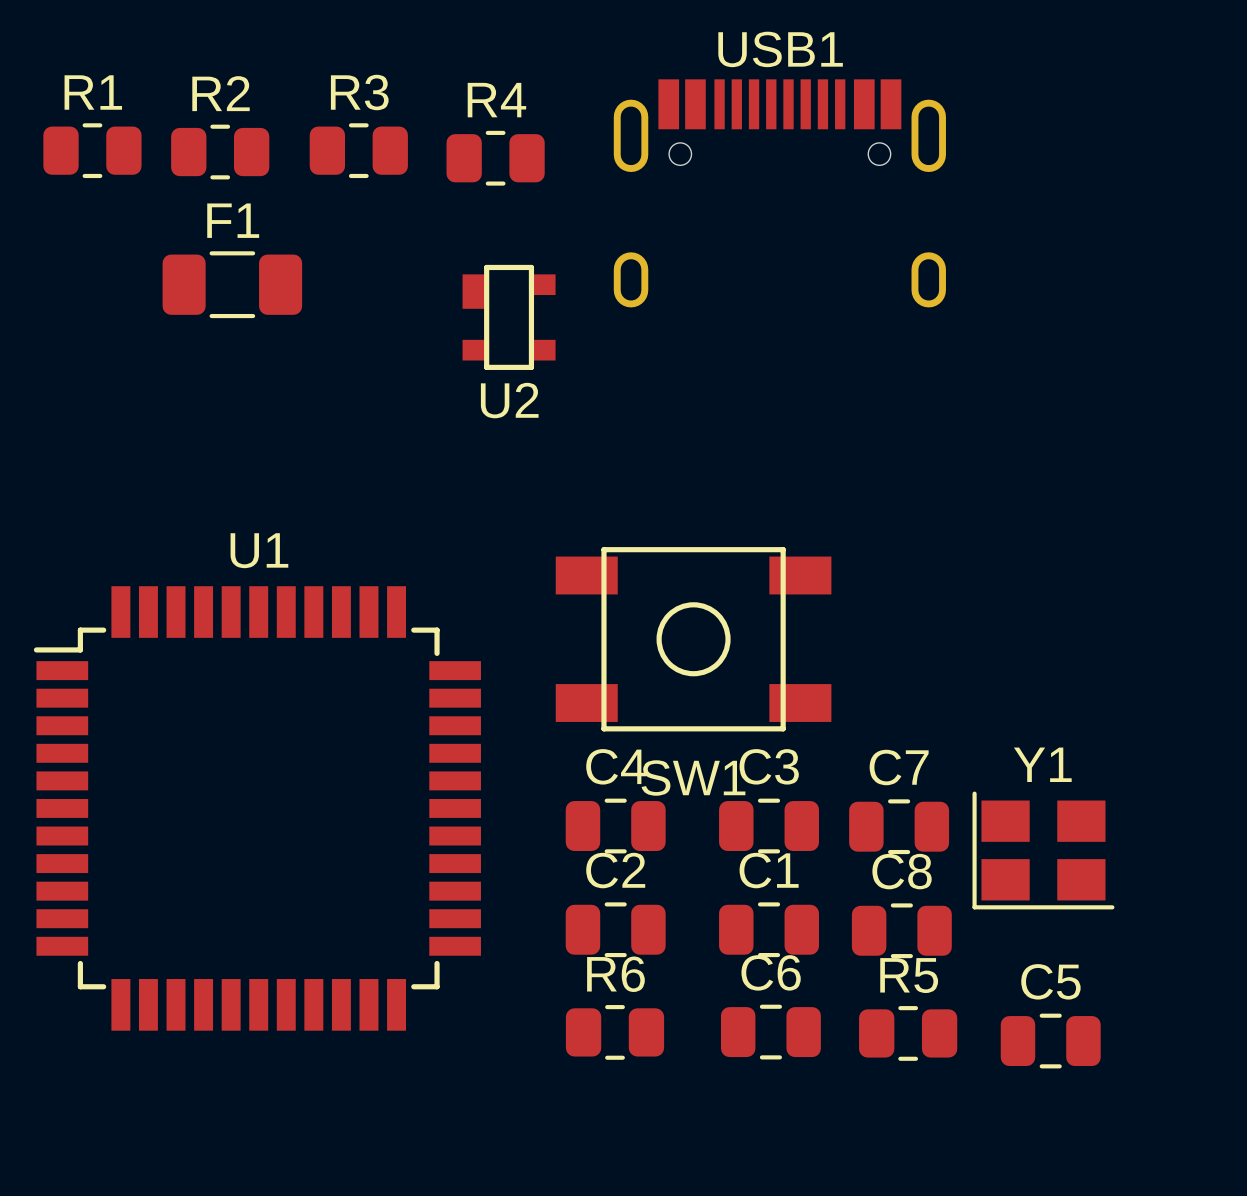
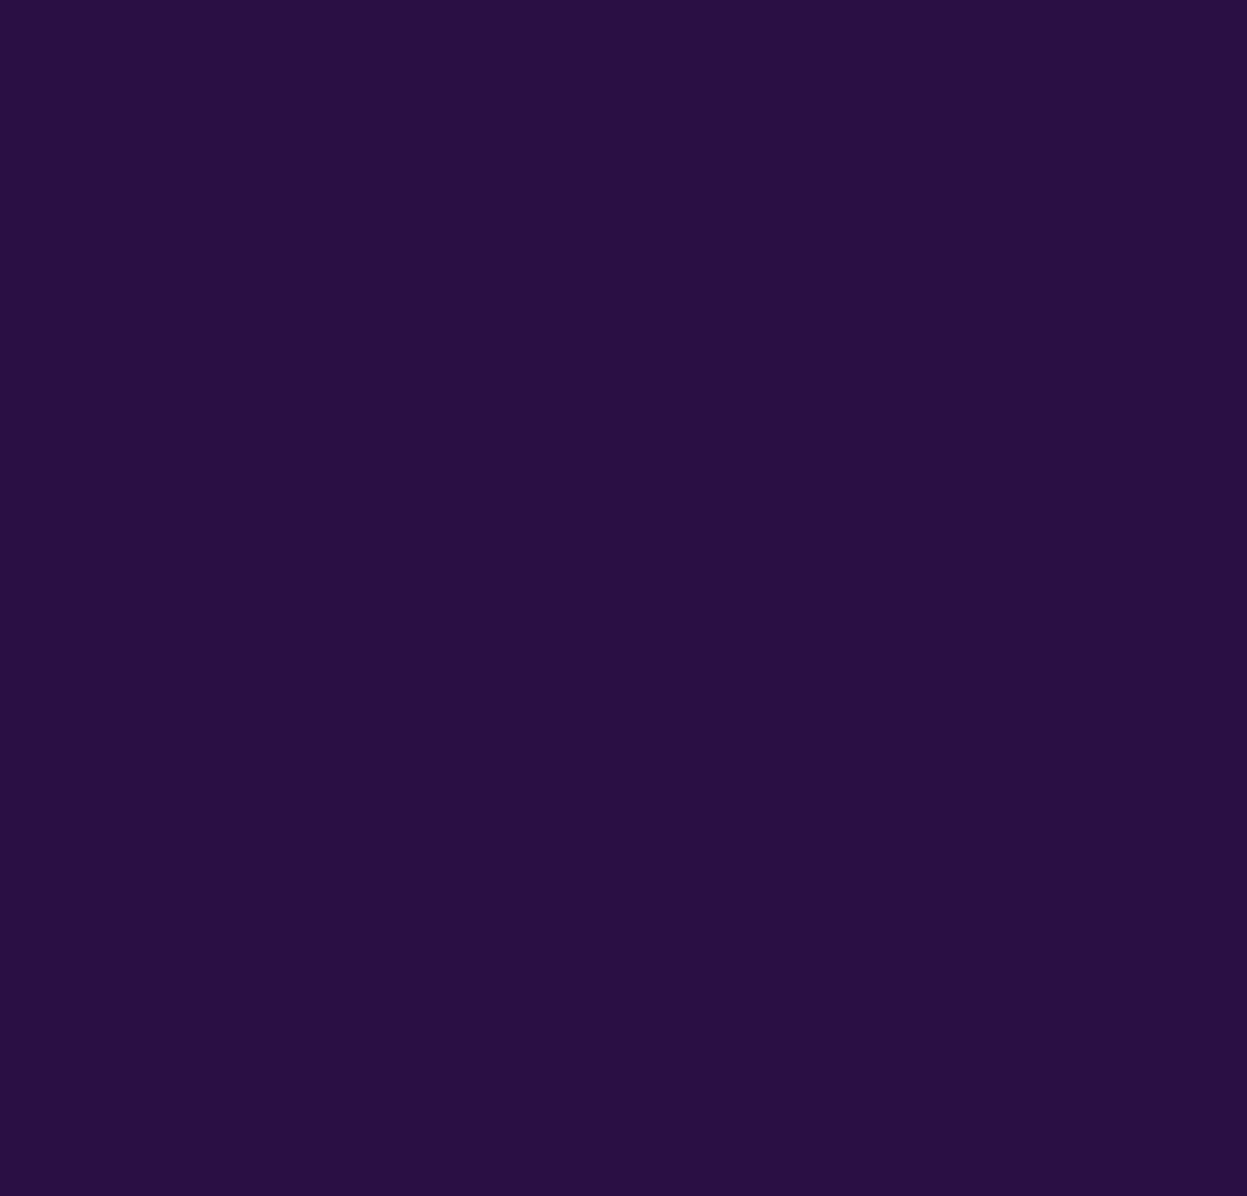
R1: (92, 150) -> none
R3: (358, 150) -> none
R2: (220, 152) -> none
R4: (495, 158) -> none
USB1: (779, 193) -> none
F1: (232, 284) -> none
U2: (509, 317) -> none
SW1: (693, 639) -> none
U1: (257, 808) -> none
C4: (615, 826) -> none
C3: (769, 826) -> none
C7: (899, 826) -> none
Y1: (1043, 850) -> none
C2: (615, 929) -> none
C1: (769, 929) -> none
C8: (901, 930) -> none
R6: (615, 1032) -> none
C6: (770, 1032) -> none
R5: (908, 1033) -> none
C5: (1050, 1041) -> none

